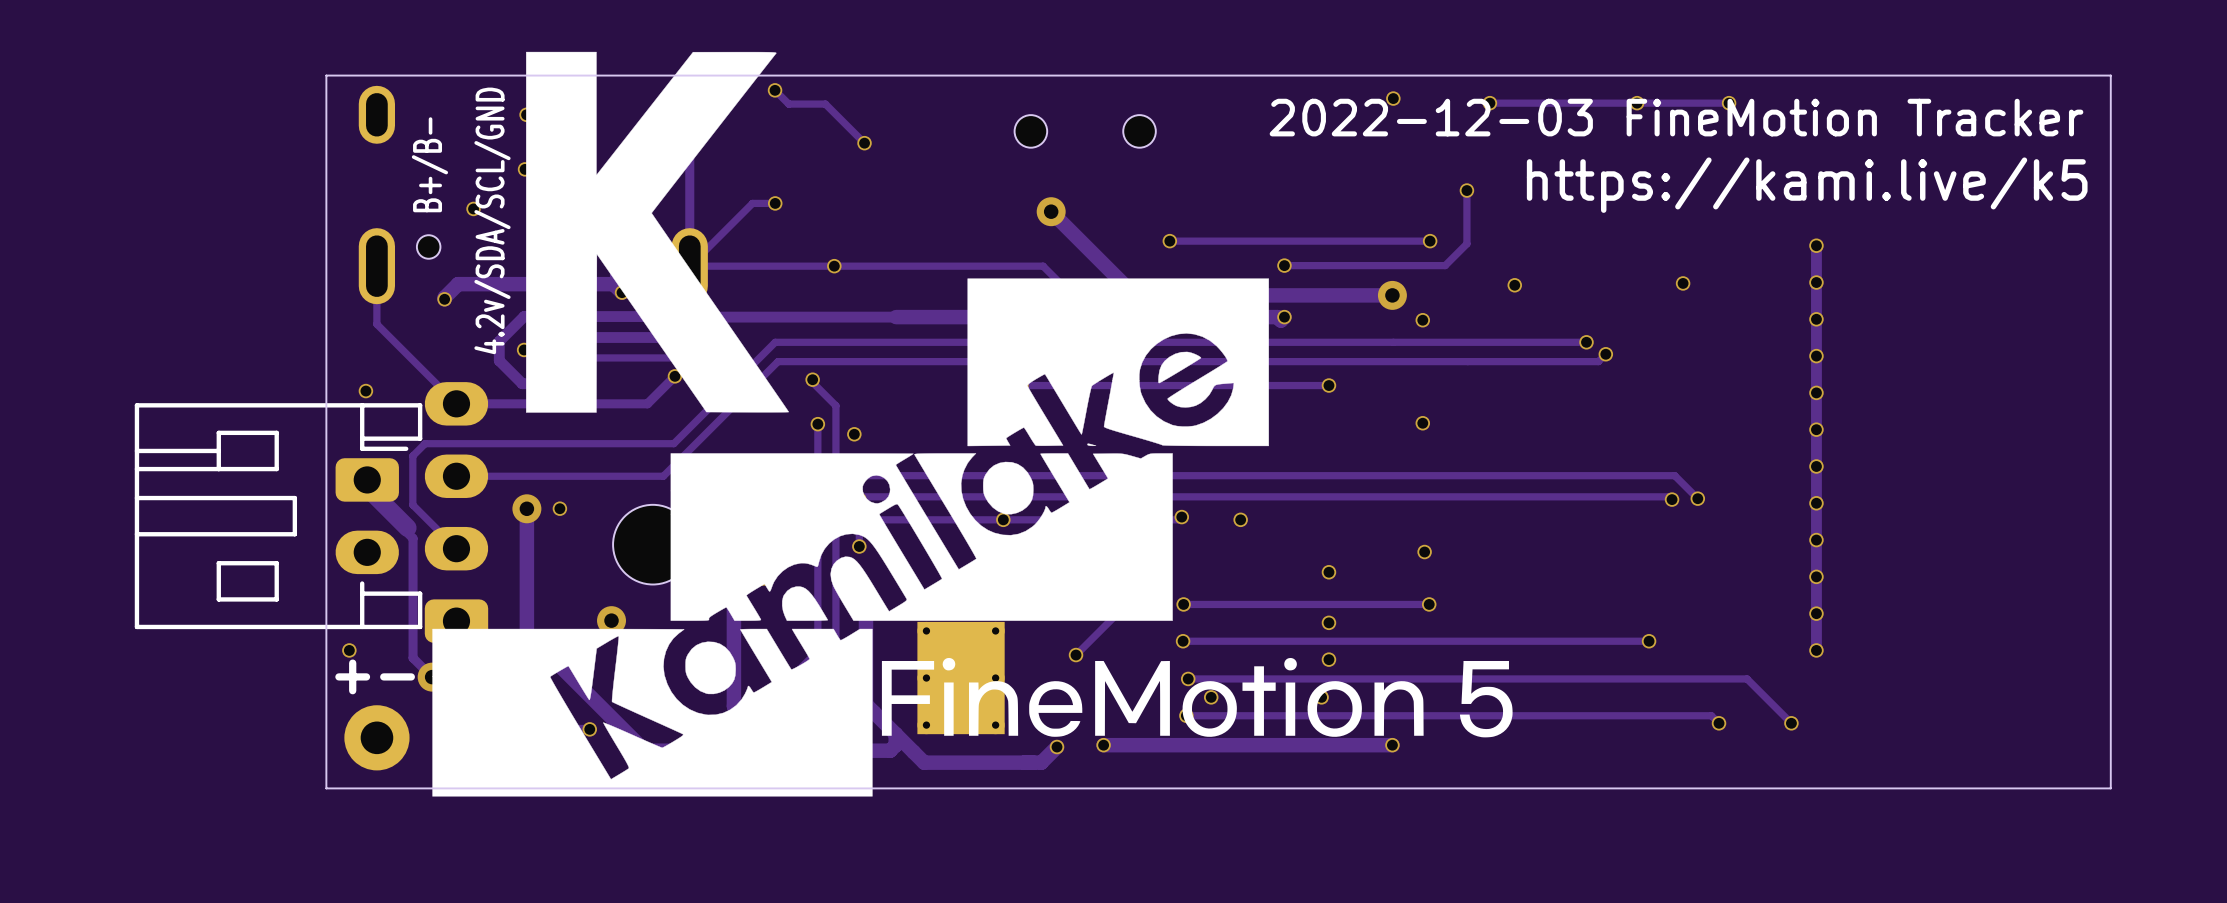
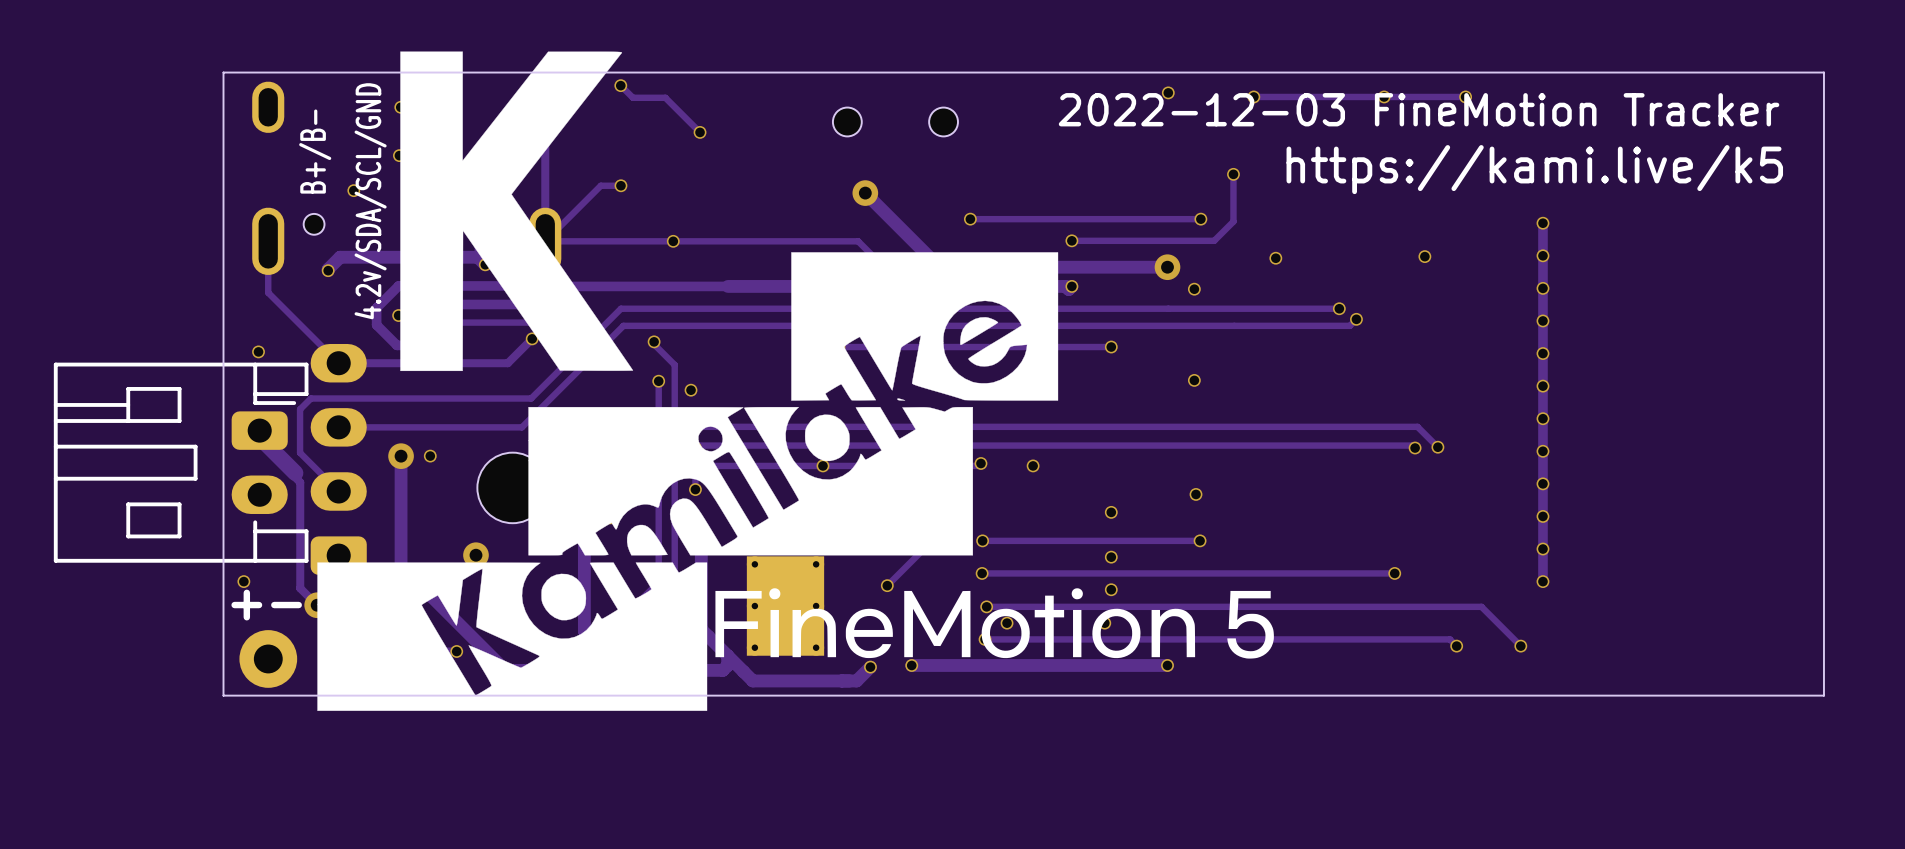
board edge: (2110, 75) (2110, 788) (326, 788) (326, 779) -> (1803, 72) (1823, 72) (1823, 695) (223, 695)

